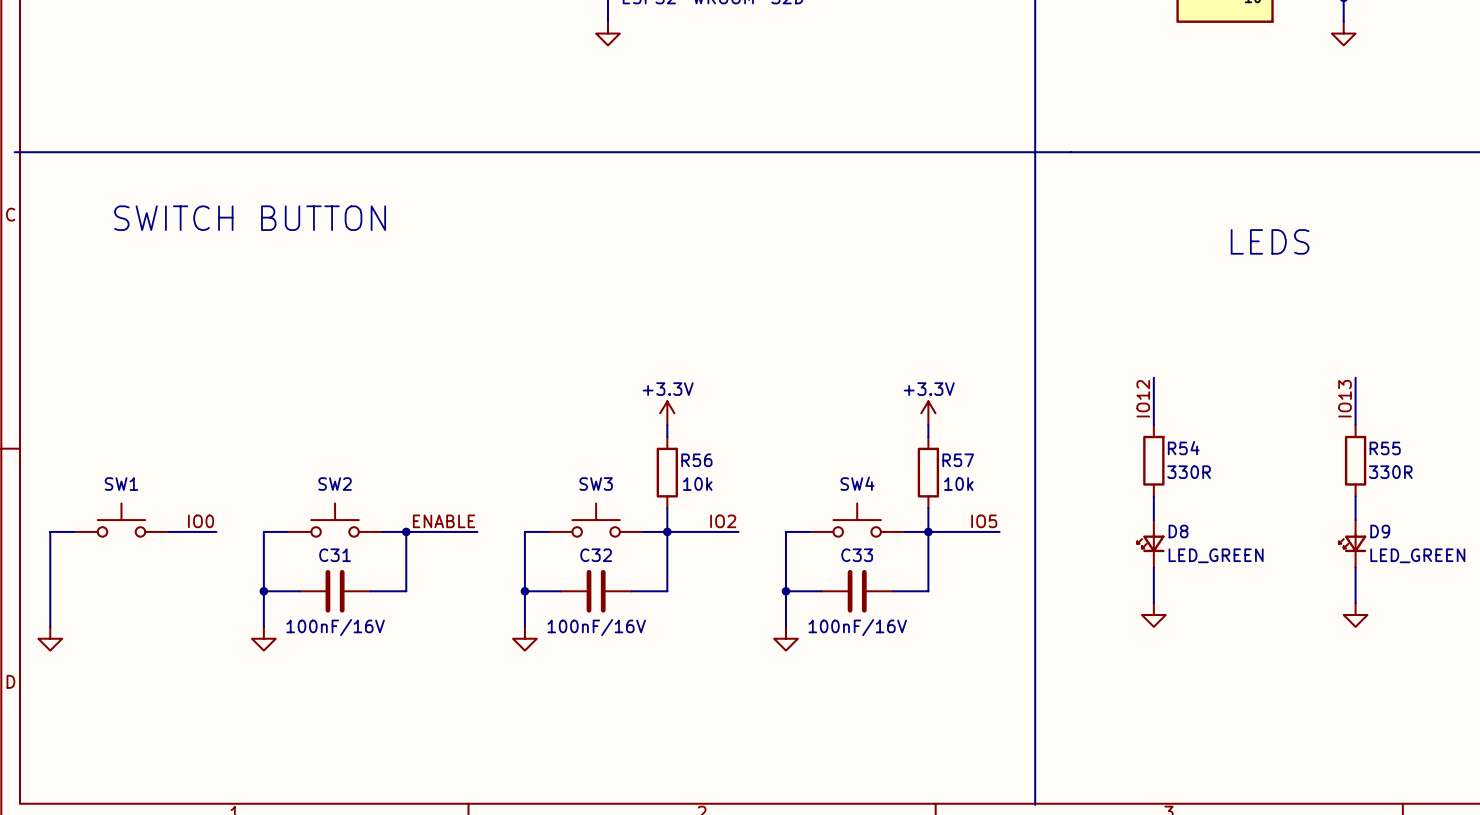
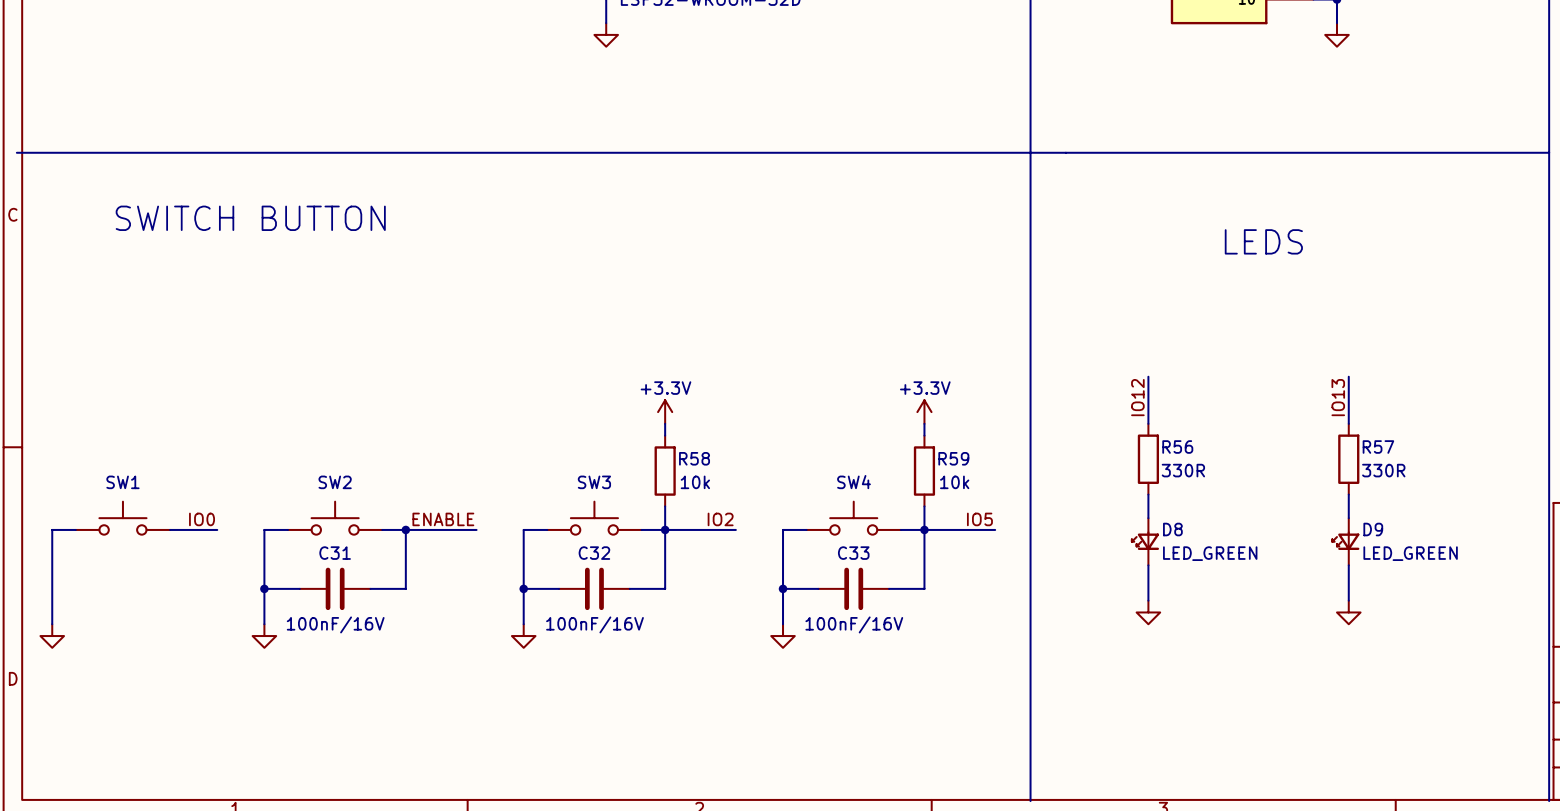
R54 name: R54 (1183, 448) -> R56 (1177, 447)
R55 name: R55 (1385, 448) -> R57 (1378, 447)
R56 name: R56 (696, 460) -> R58 (694, 458)
R57 name: R57 (958, 460) -> R59 (953, 458)

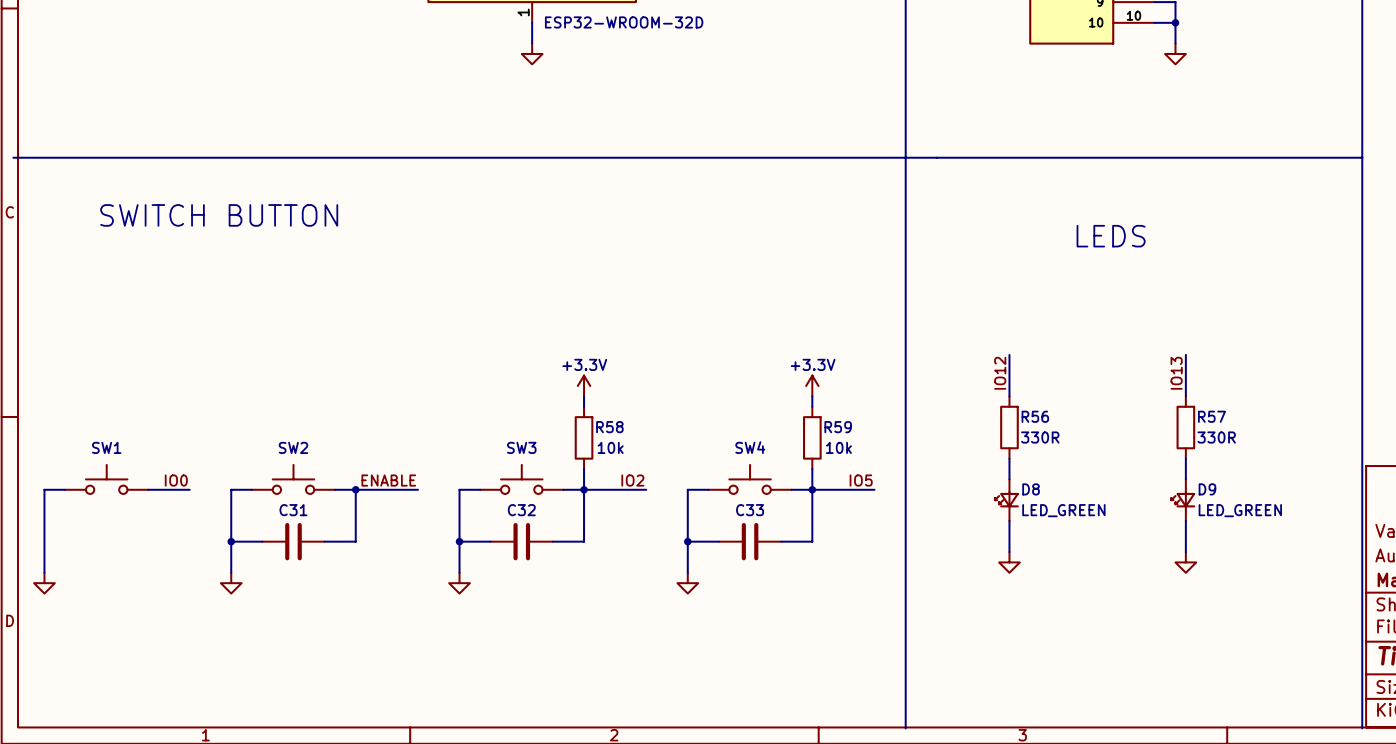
C31 value: 100nF/16V (335, 624) -> none
C32 value: 100nF/16V (594, 624) -> none
C33 value: 100nF/16V (854, 624) -> none

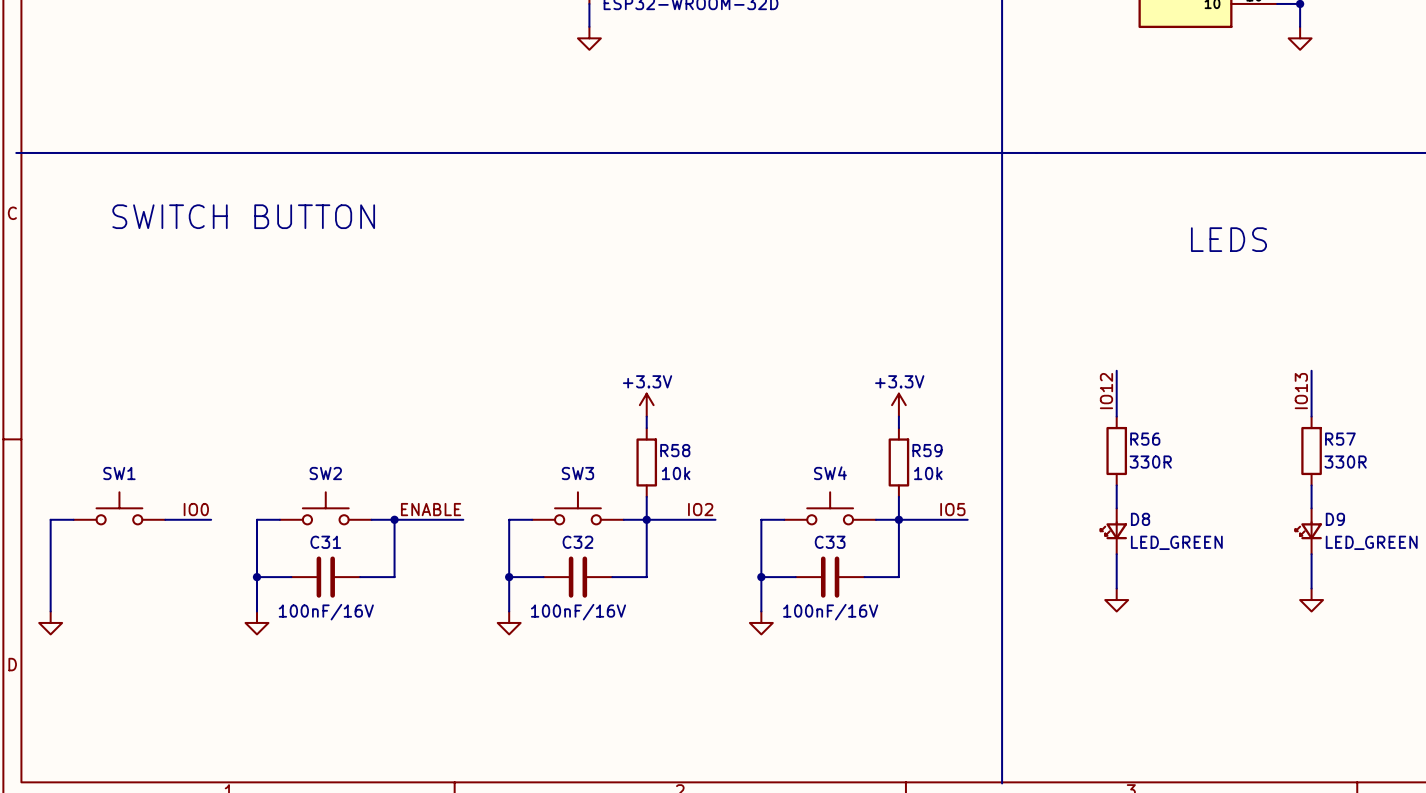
C31 value: none -> 100nF/16V (326, 612)
C32 value: none -> 100nF/16V (578, 612)
C33 value: none -> 100nF/16V (830, 612)

